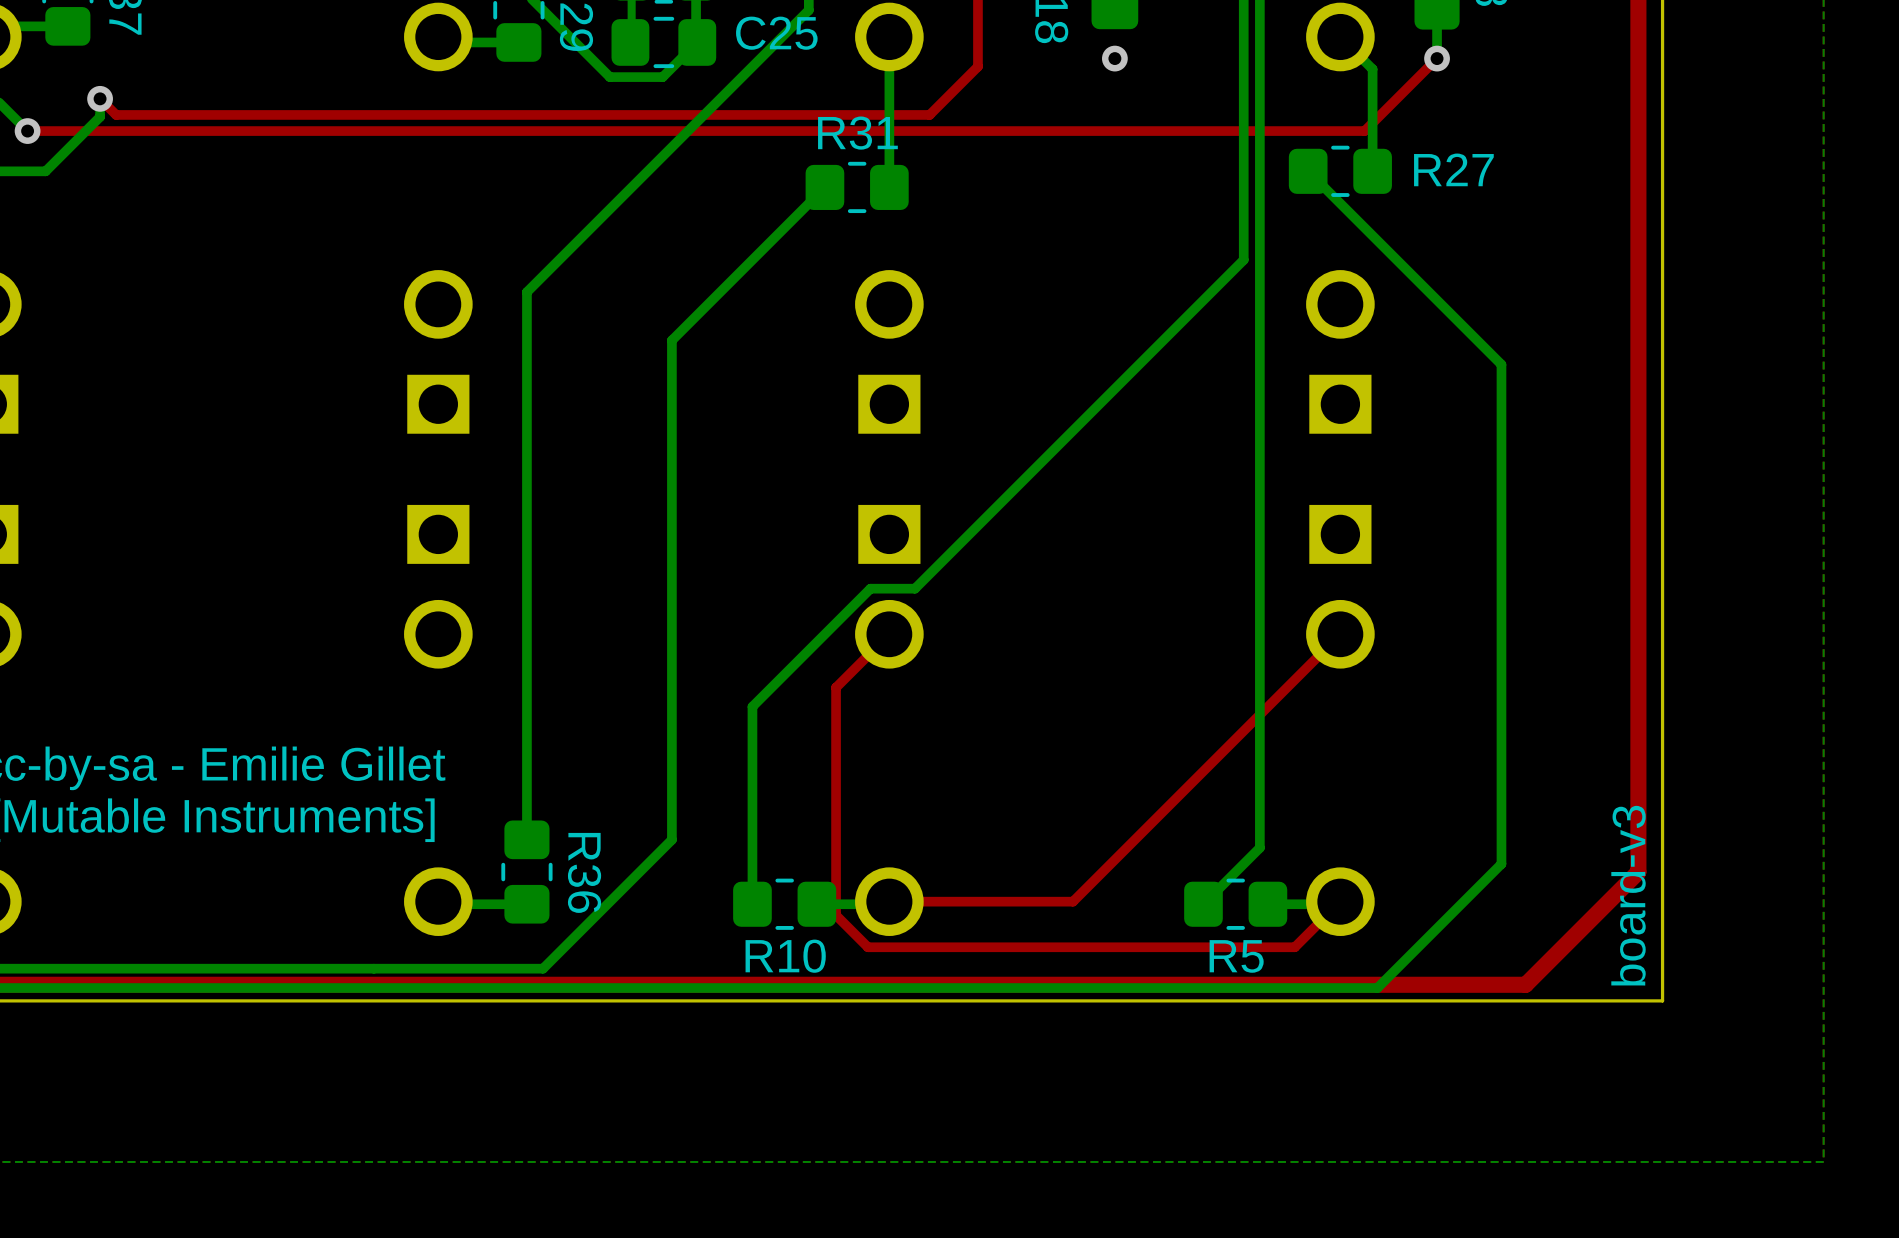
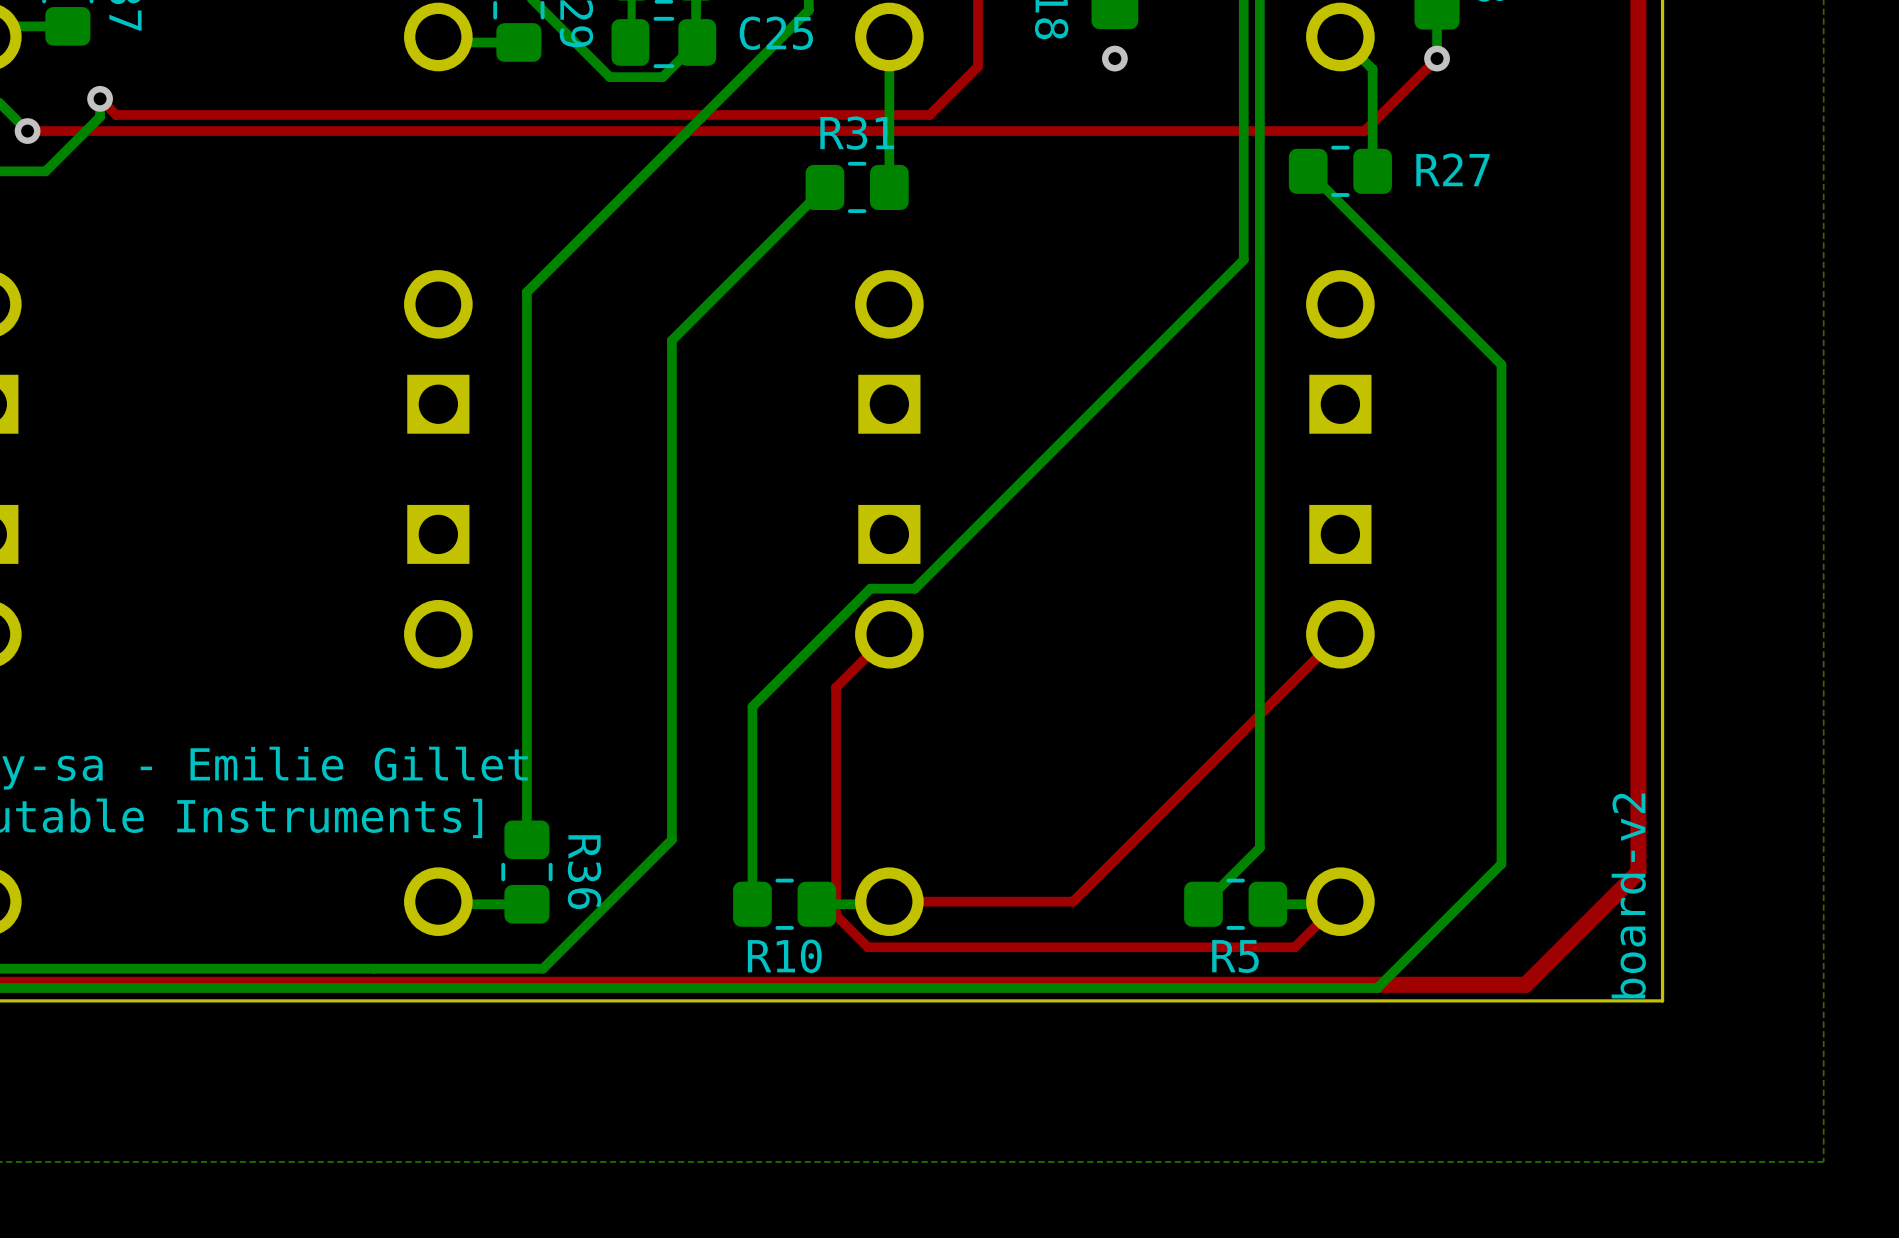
text: board-v3 (1628, 895) -> board-v2 (1628, 895)

